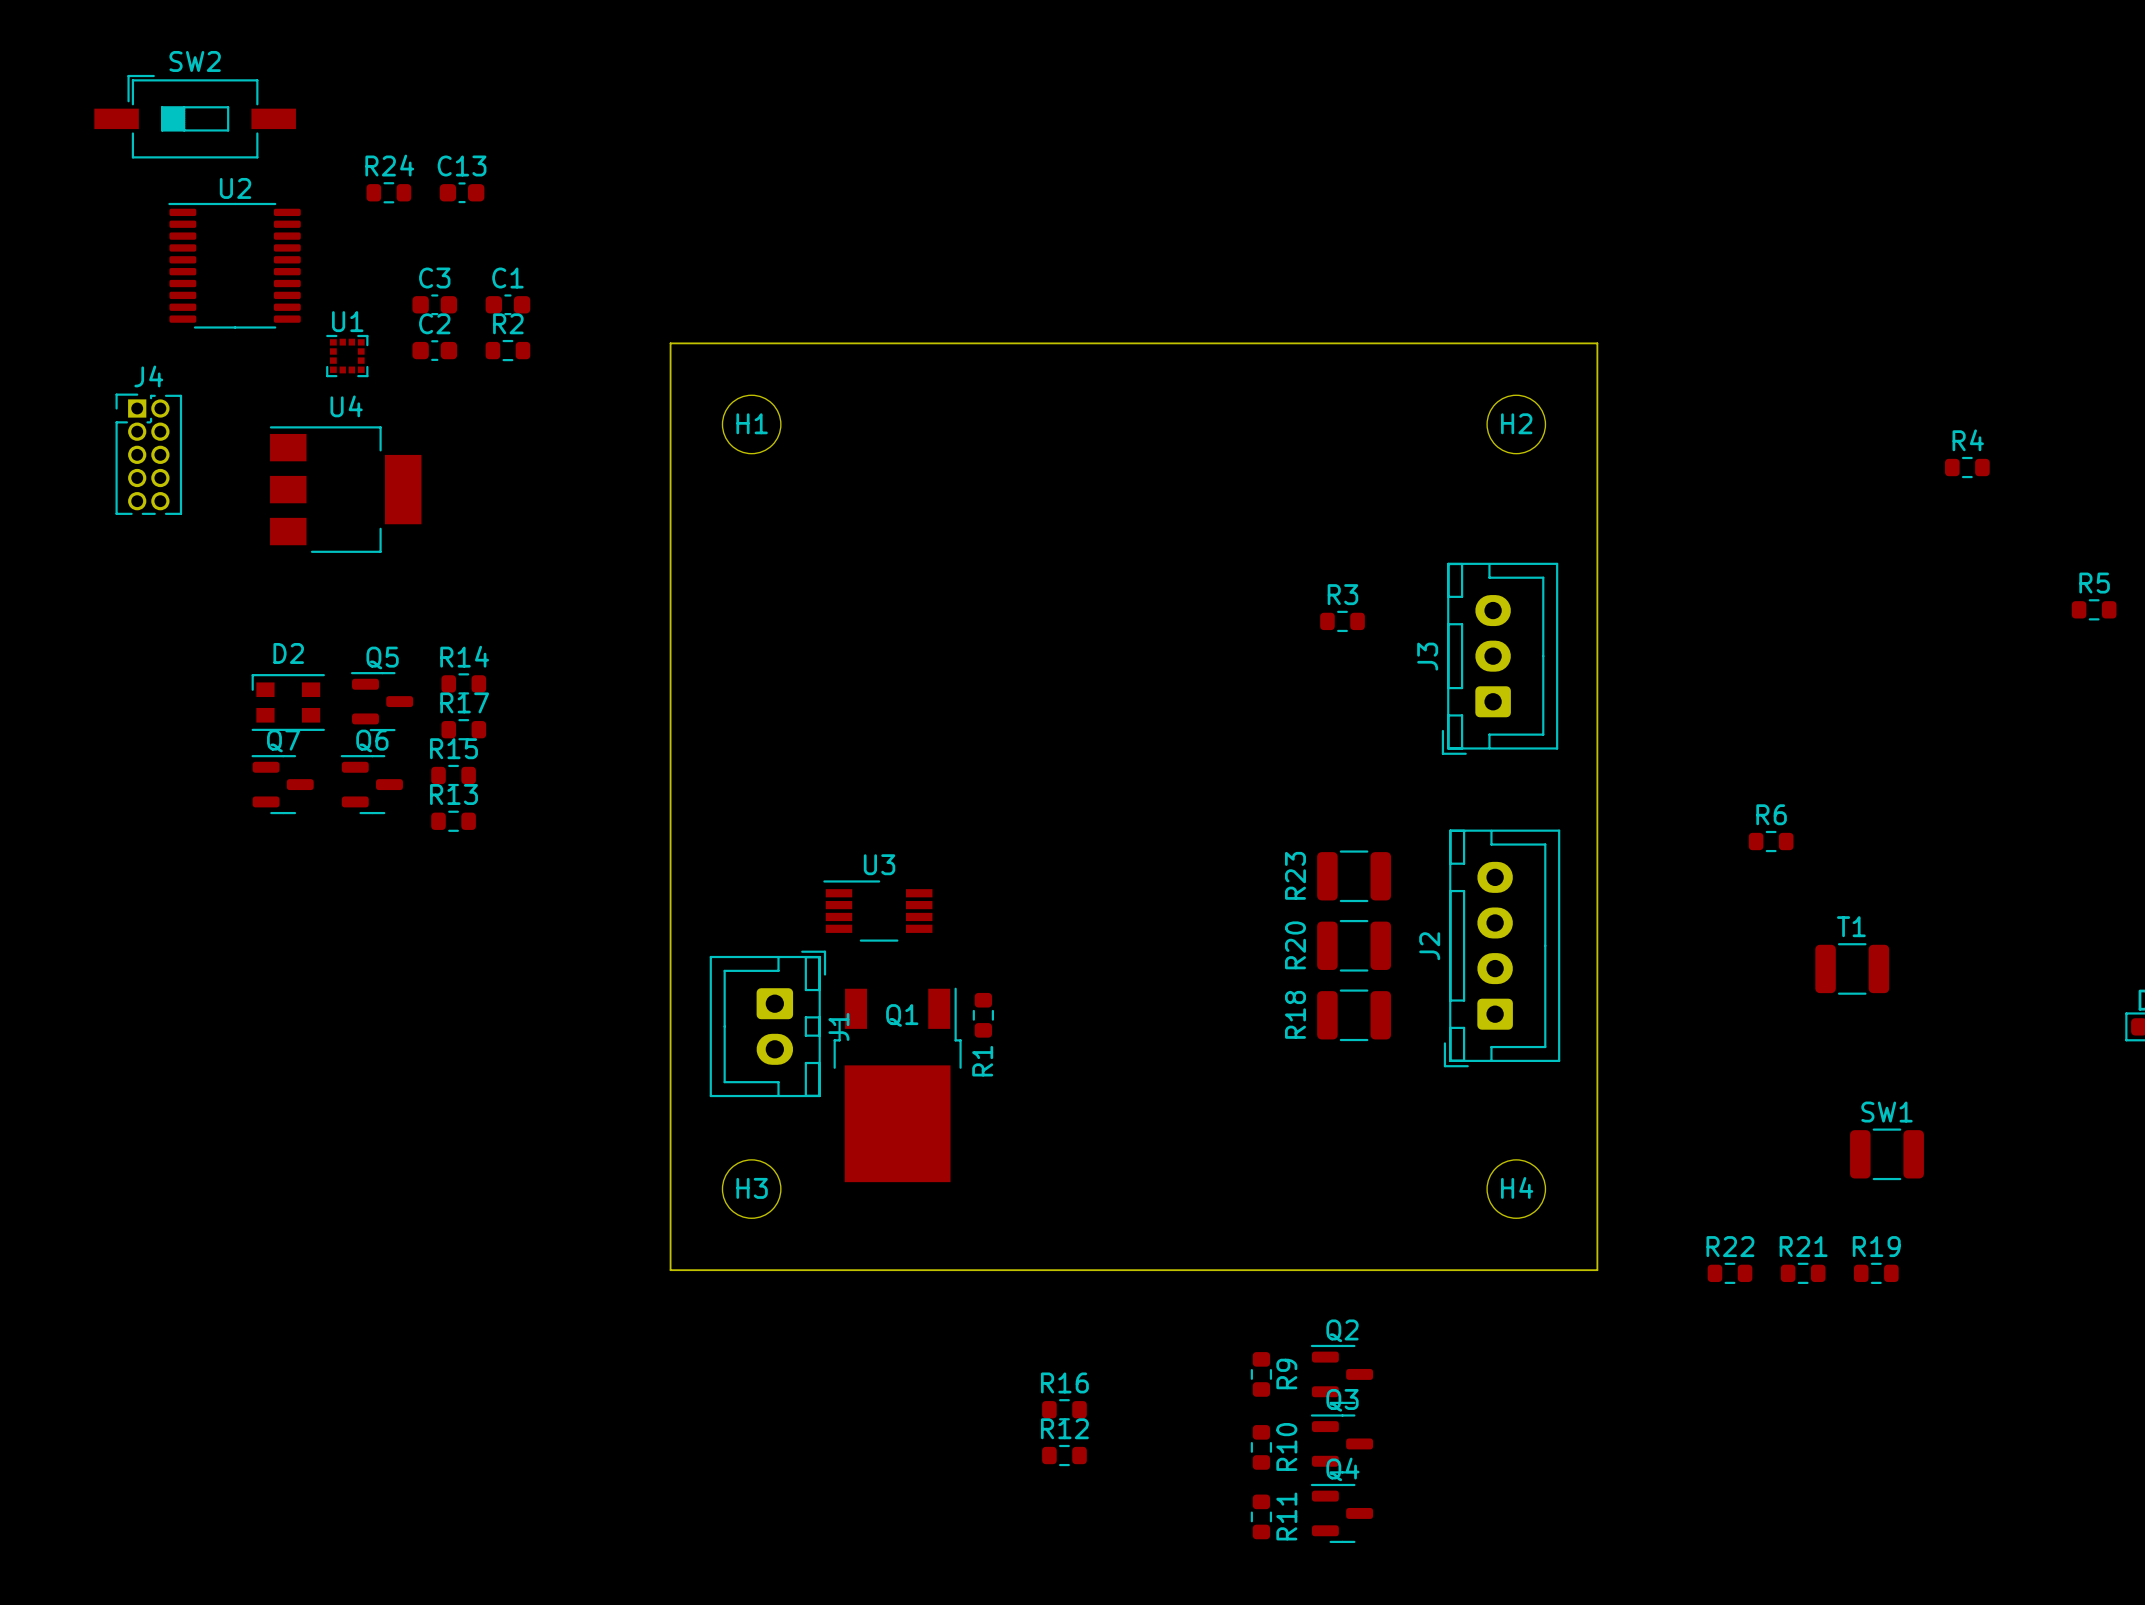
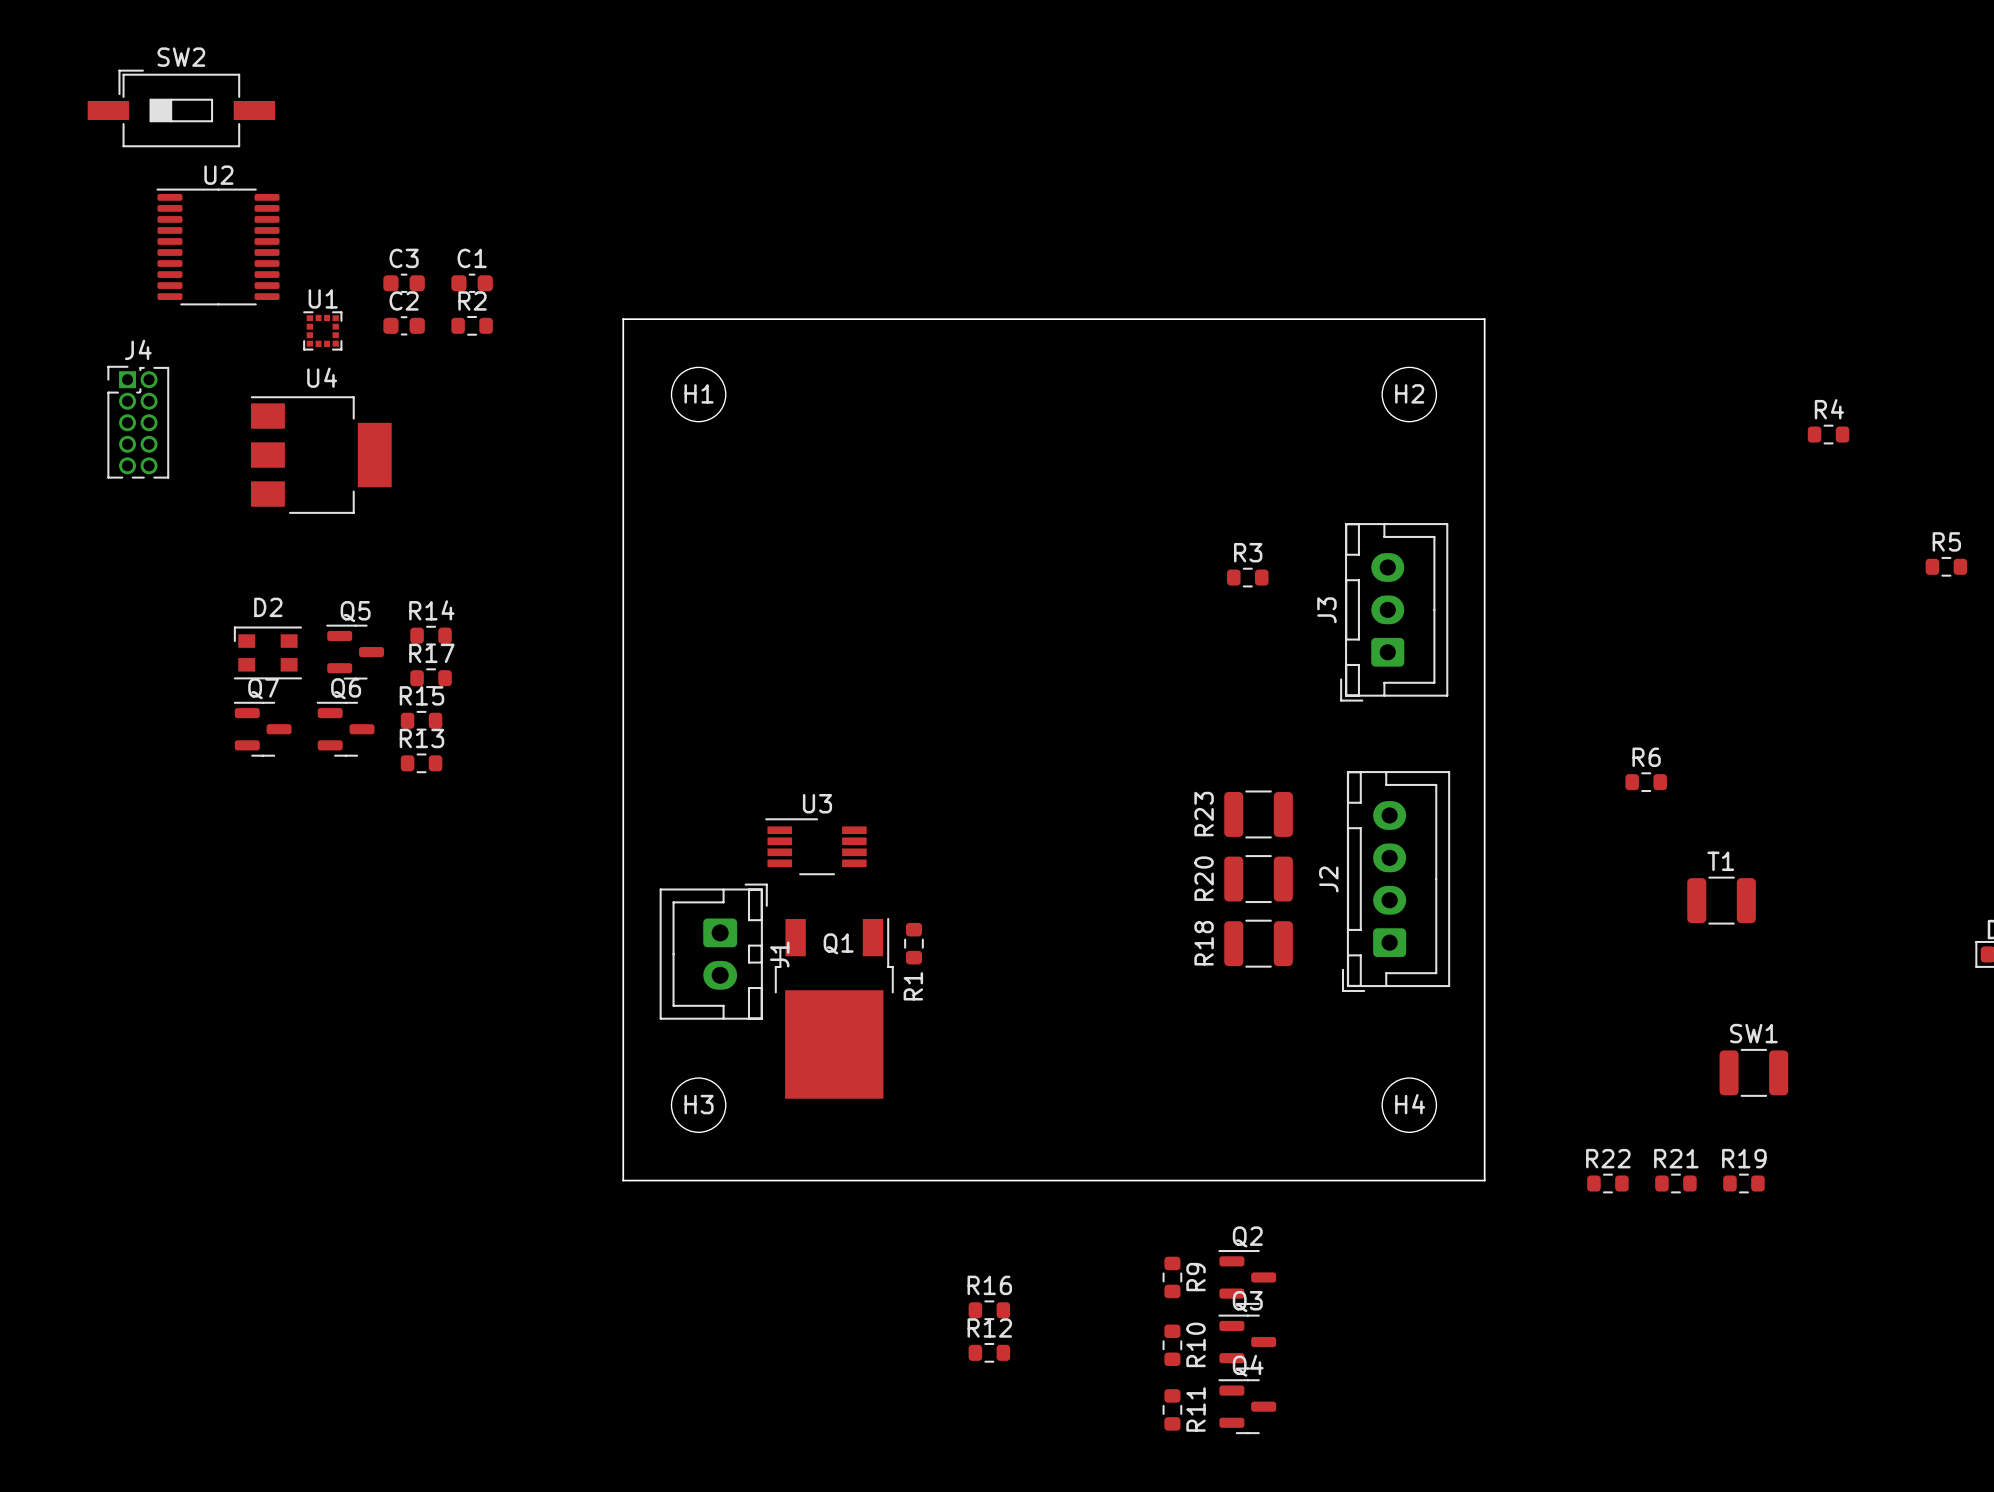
R24: (388, 192) -> none
C13: (462, 192) -> none

